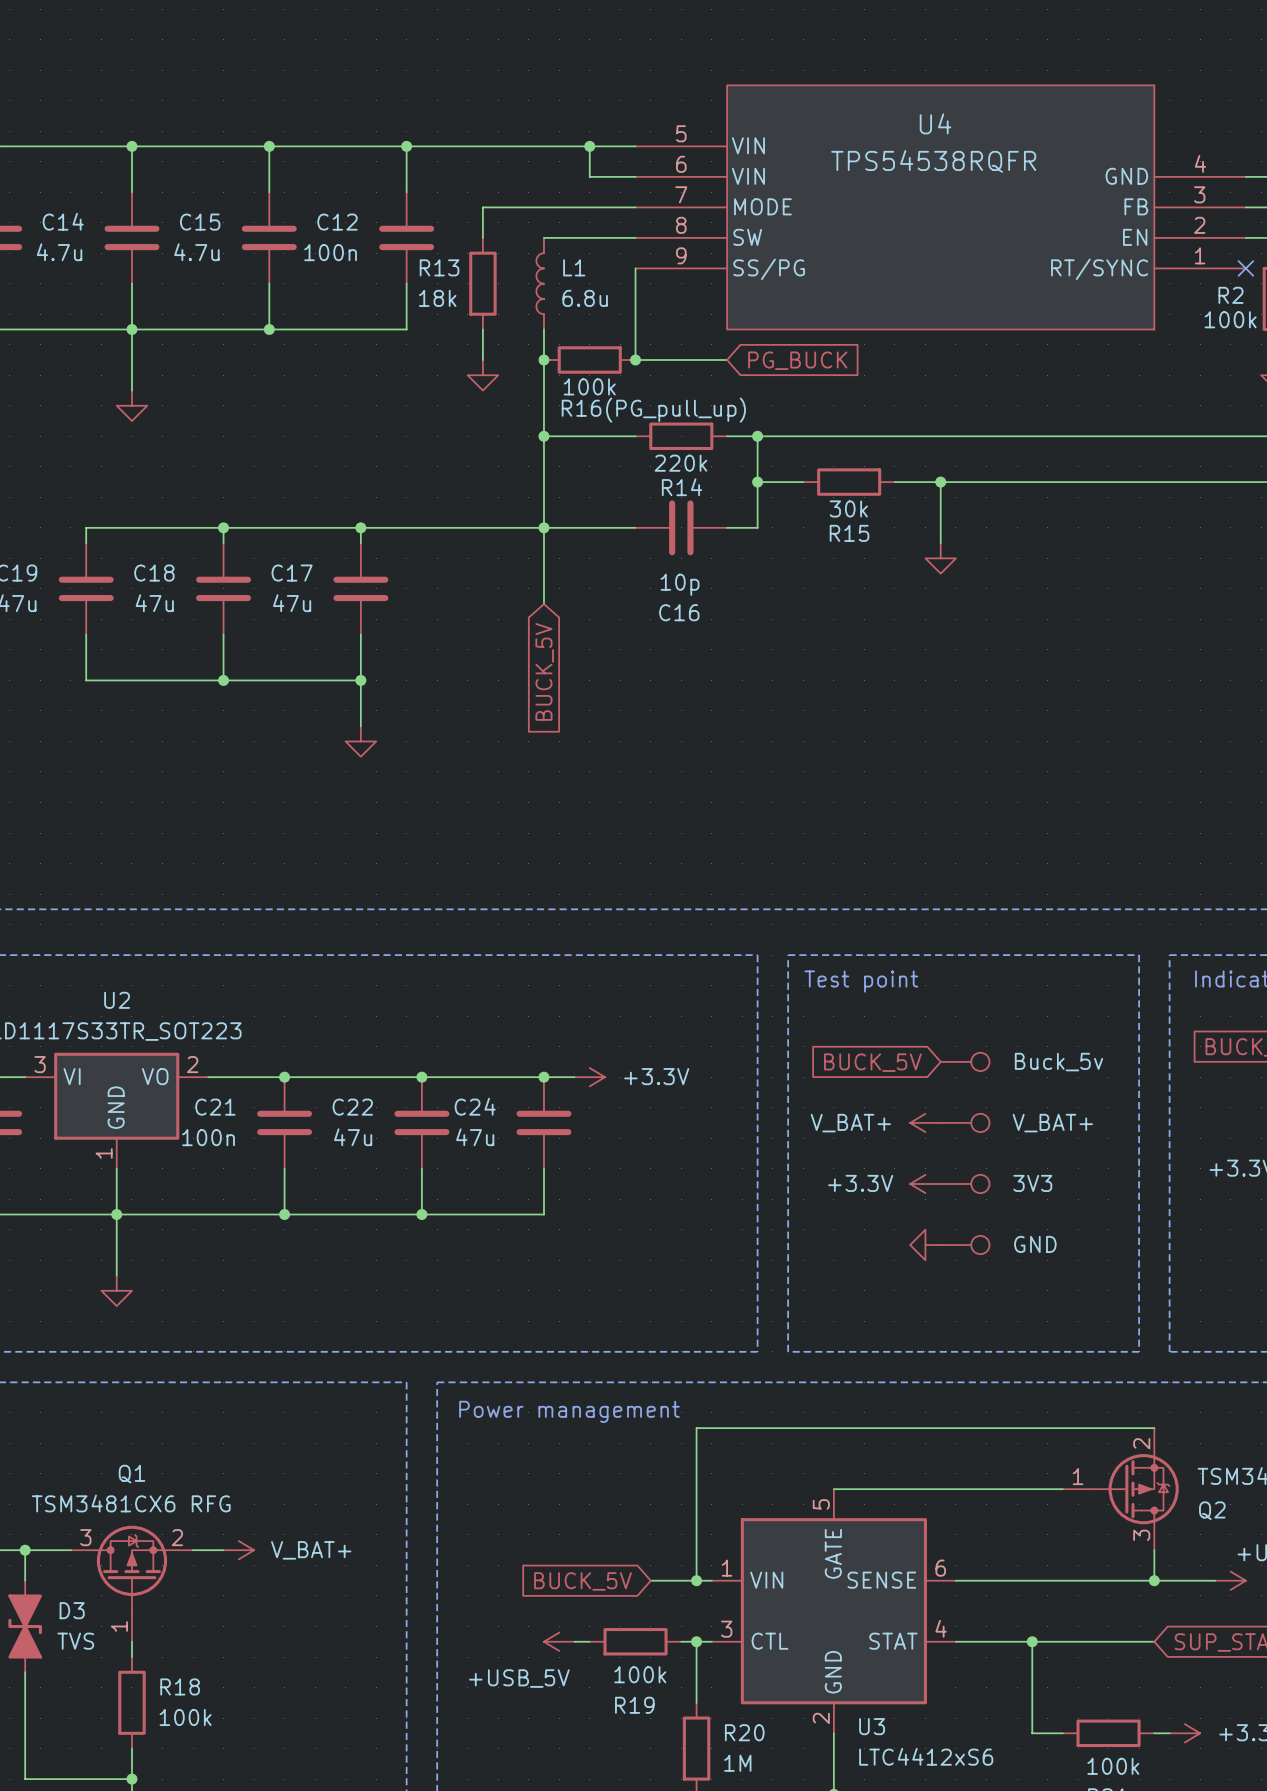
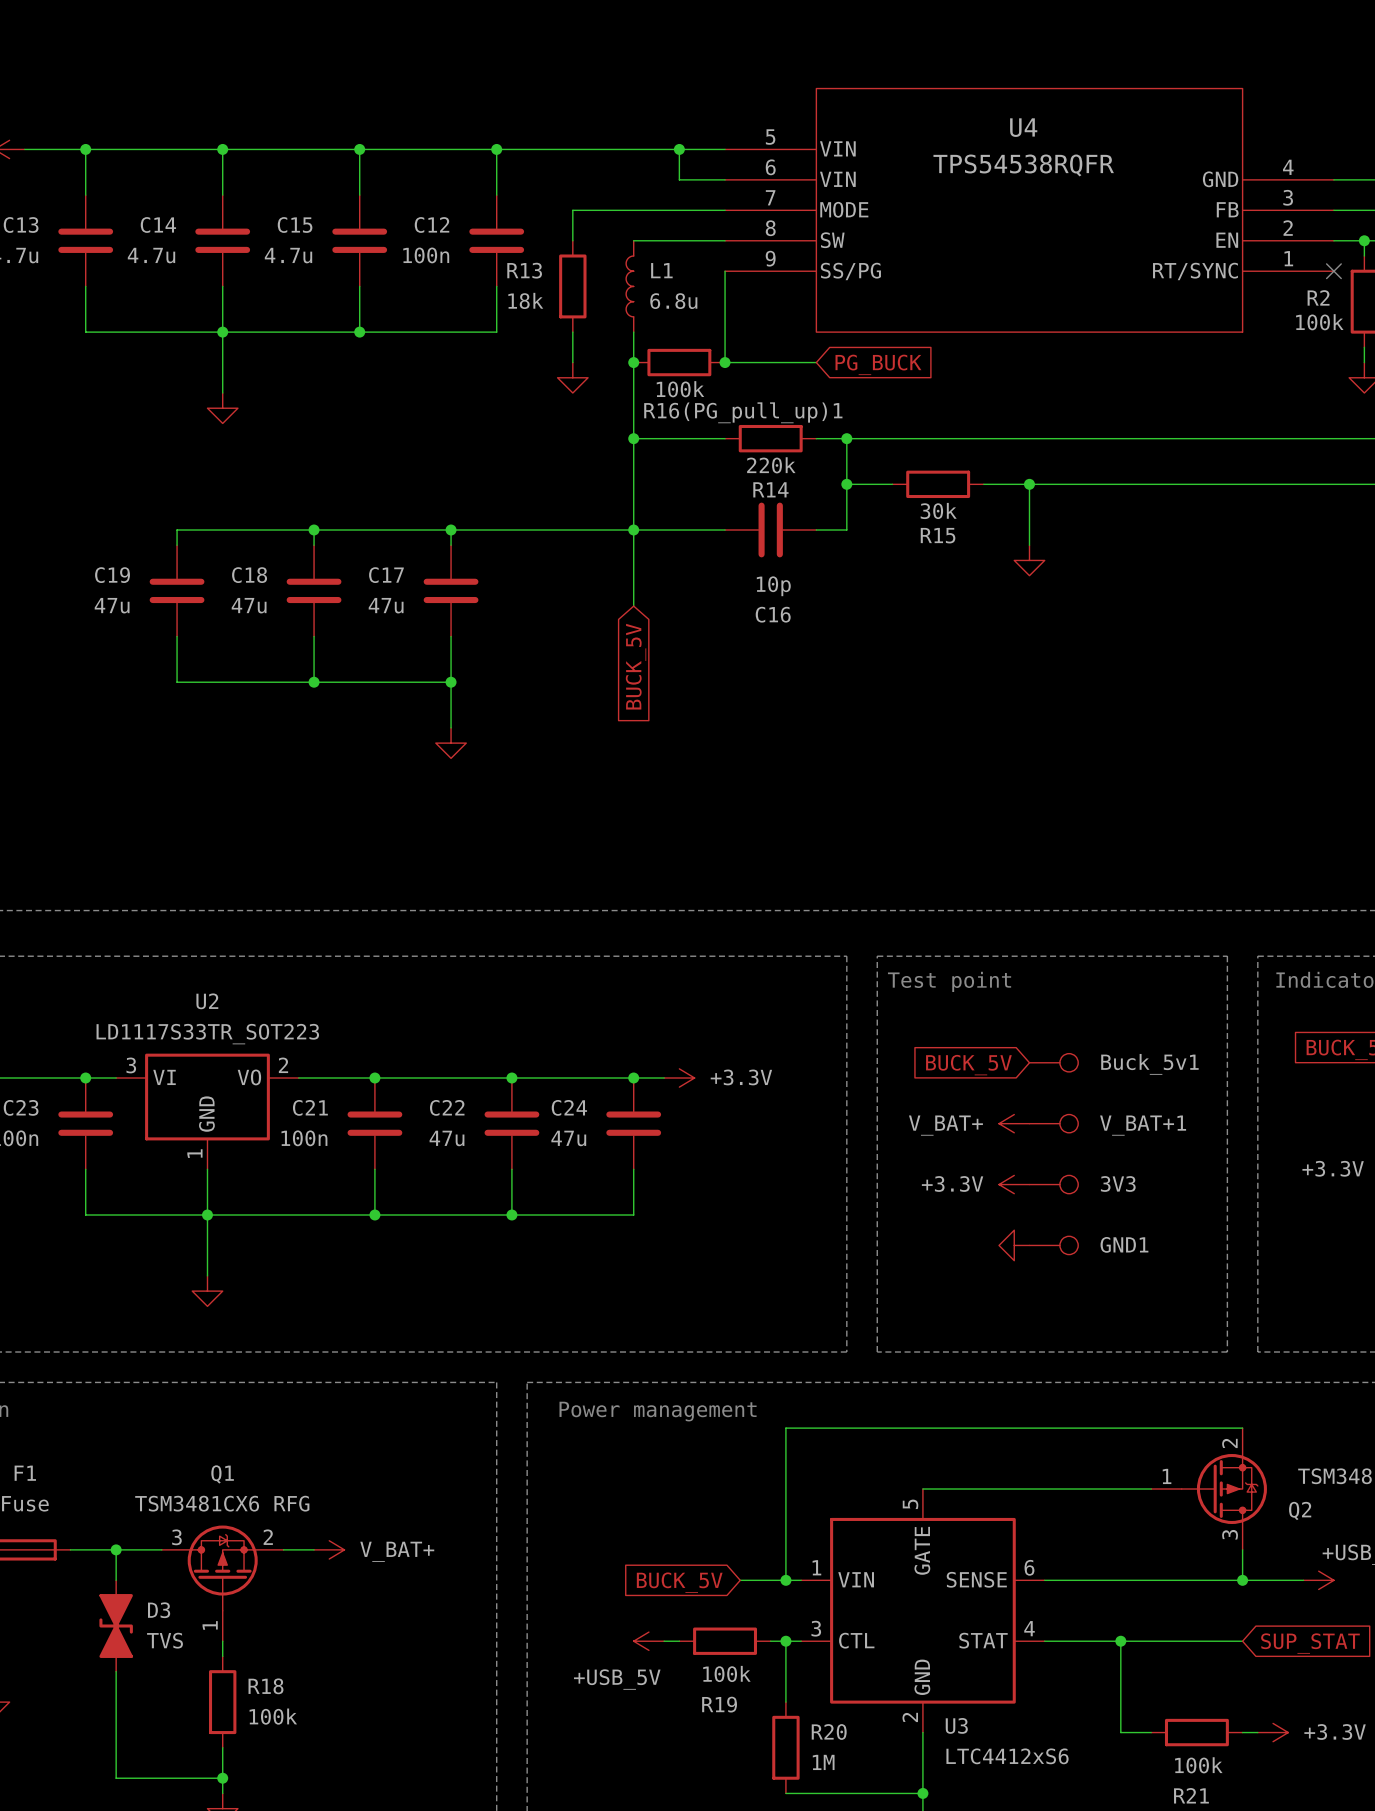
R16(PG_pull_up) name: R16(PG_pull_up) (653, 410) -> R16(PG_pull_up)1 (743, 412)
Buck_5v name: Buck_5v (1058, 1062) -> Buck_5v1 (1149, 1064)
V_BAT+ name: V_BAT+ (1052, 1123) -> V_BAT+1 (1143, 1125)
GND name: GND (1035, 1244) -> GND1 (1124, 1244)

